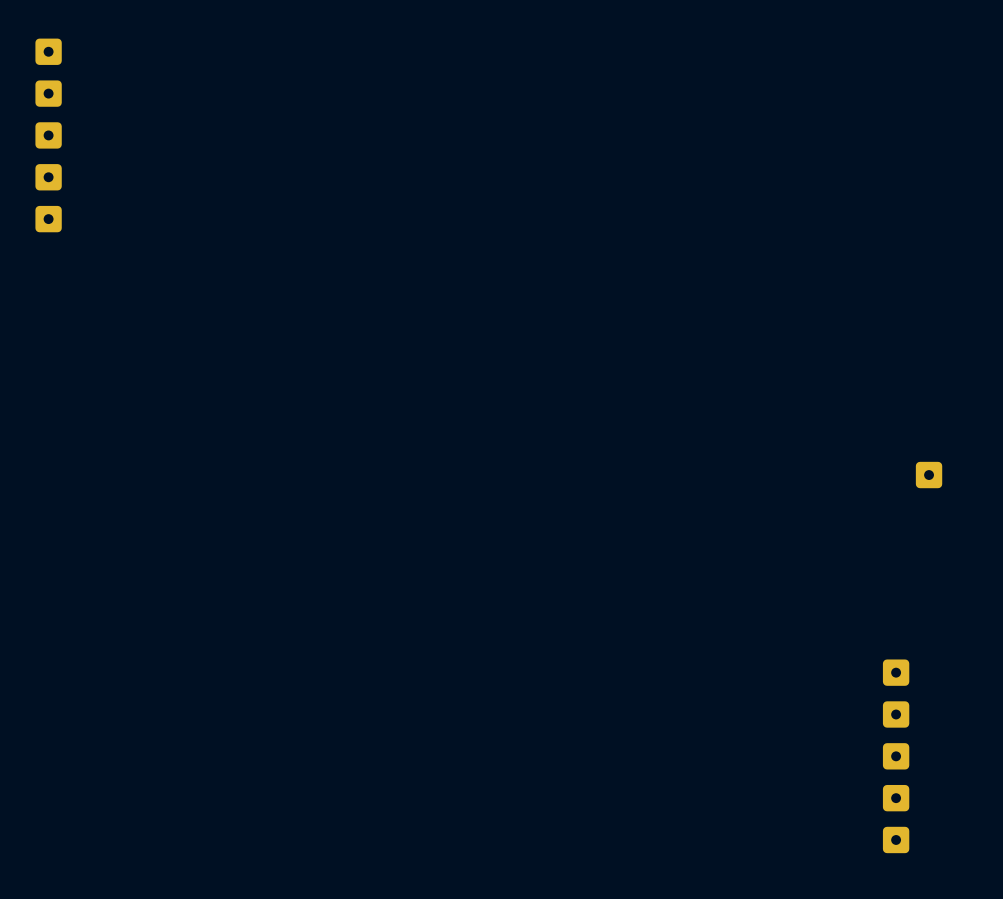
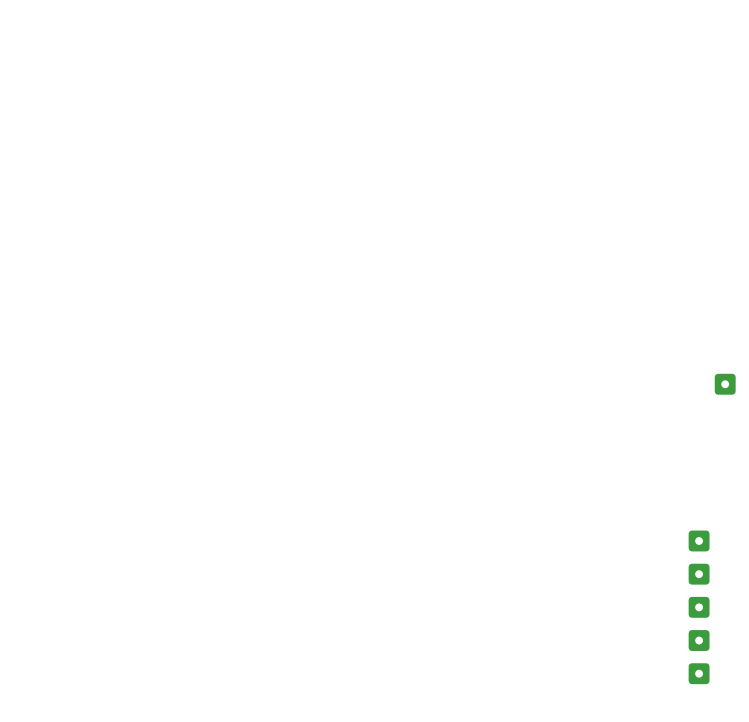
part: (48, 51) -> none
part: (48, 93) -> none
part: (48, 135) -> none
part: (48, 177) -> none
part: (48, 219) -> none

